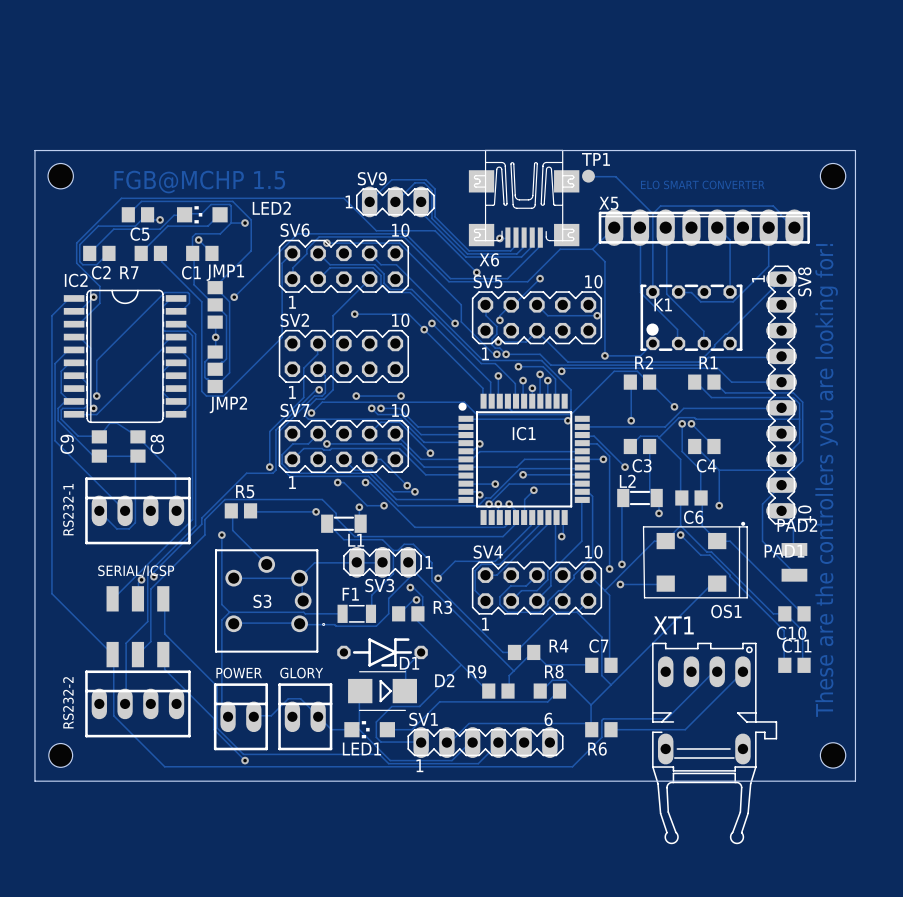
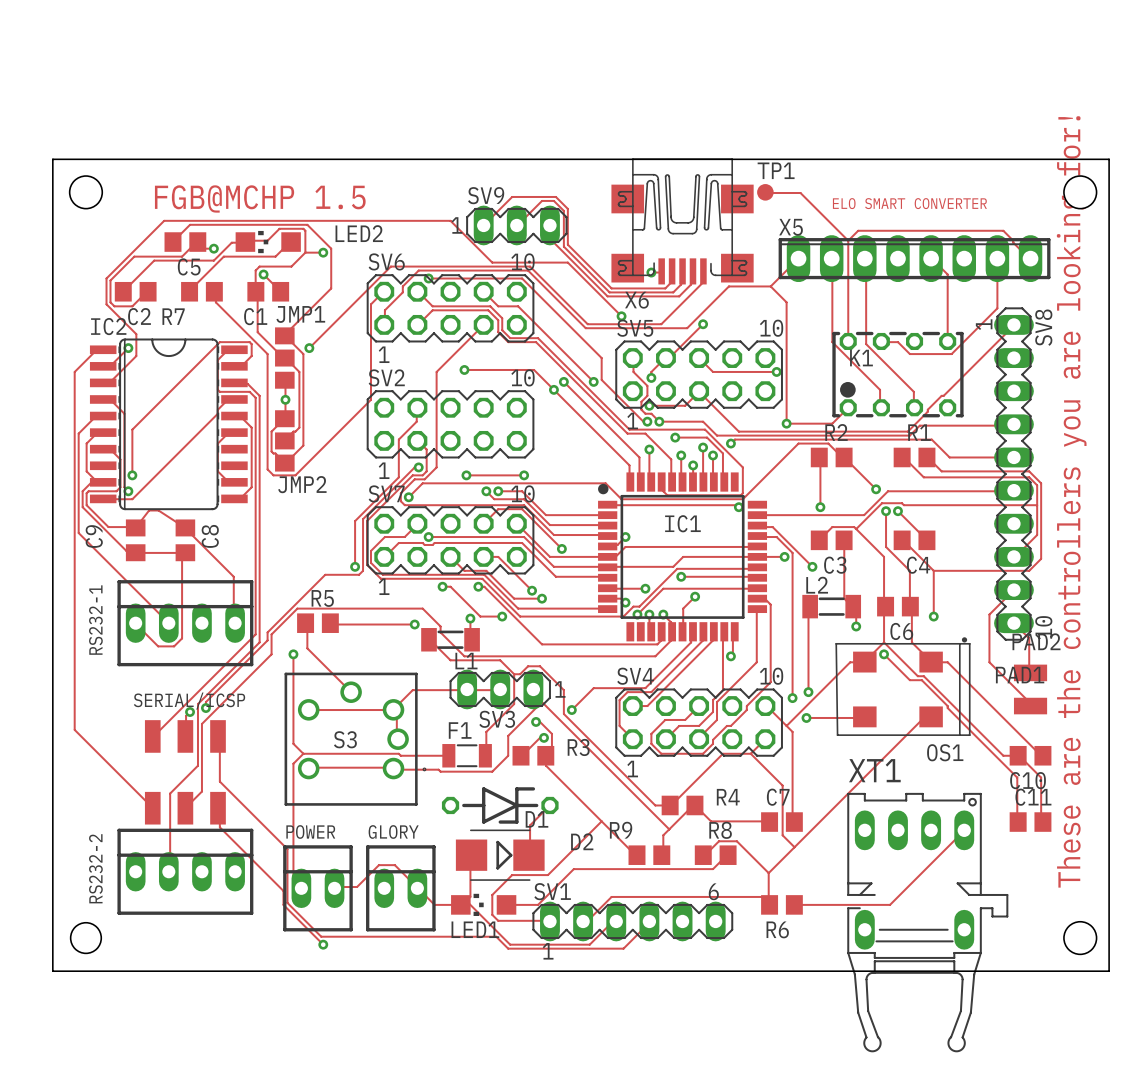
track: (112, 654) (113, 715) (164, 766) (572, 766) (601, 737) (603, 718) (666, 718) (713, 672) (717, 671) -> none

